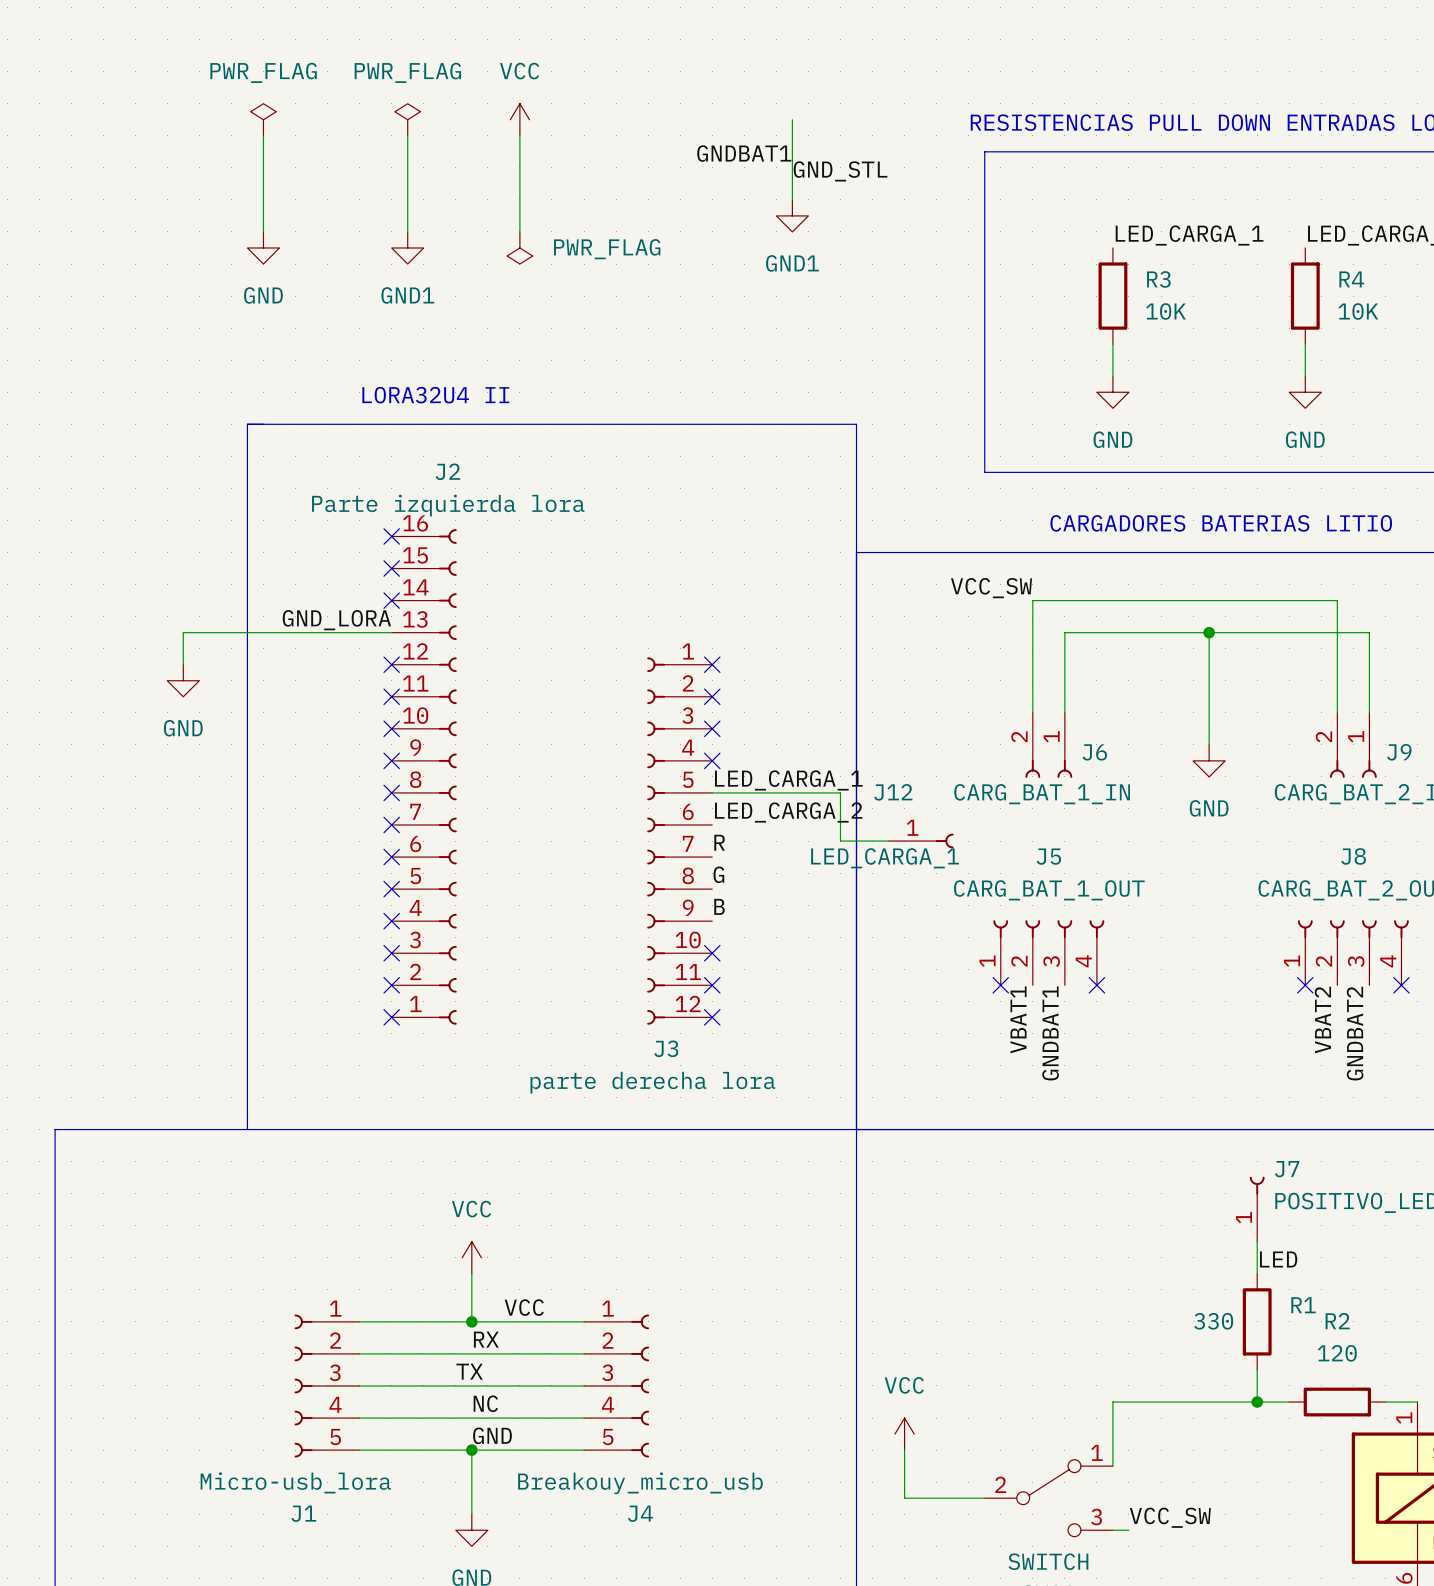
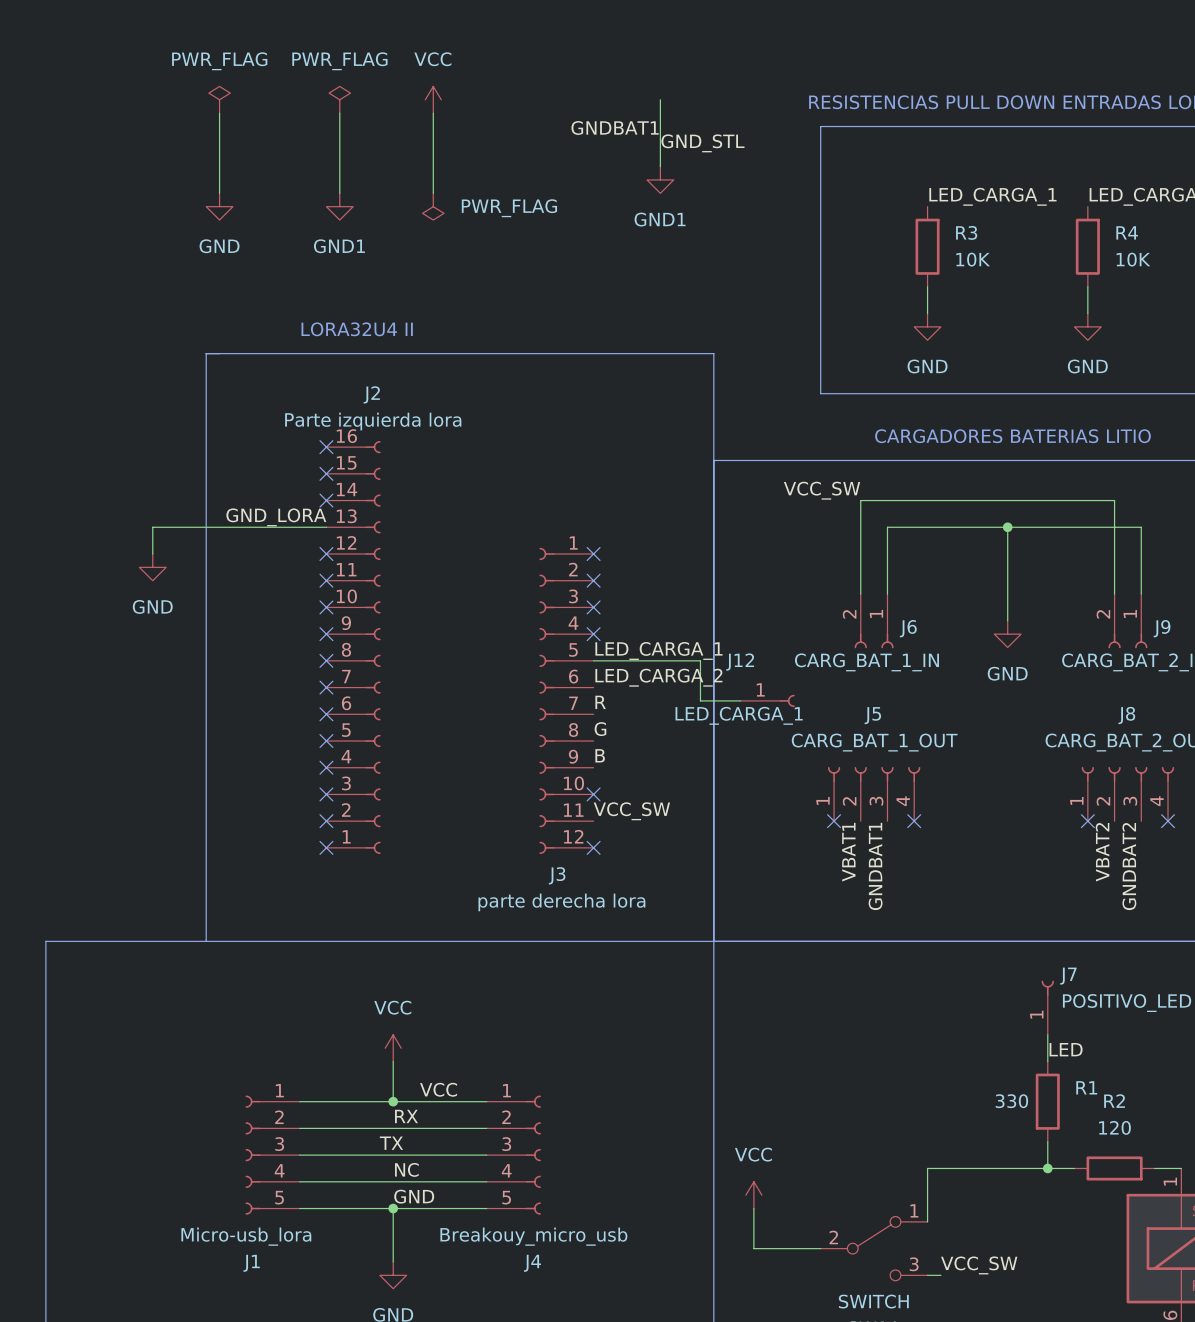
label: none -> VCC_SW (631, 811)
no-connect mark: (712, 985) -> none

